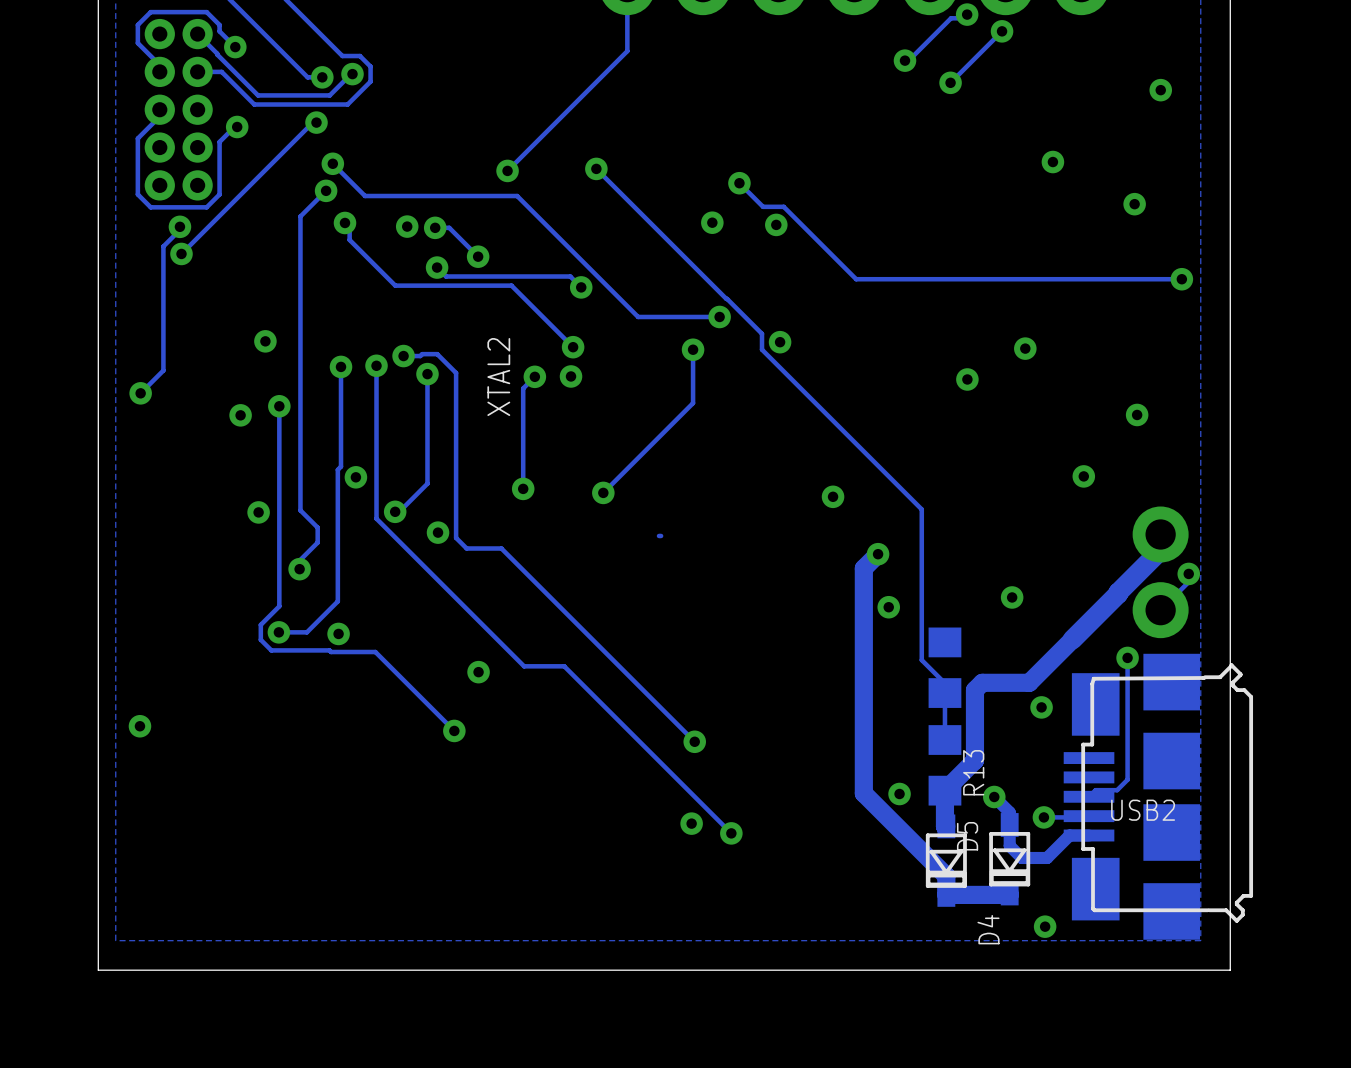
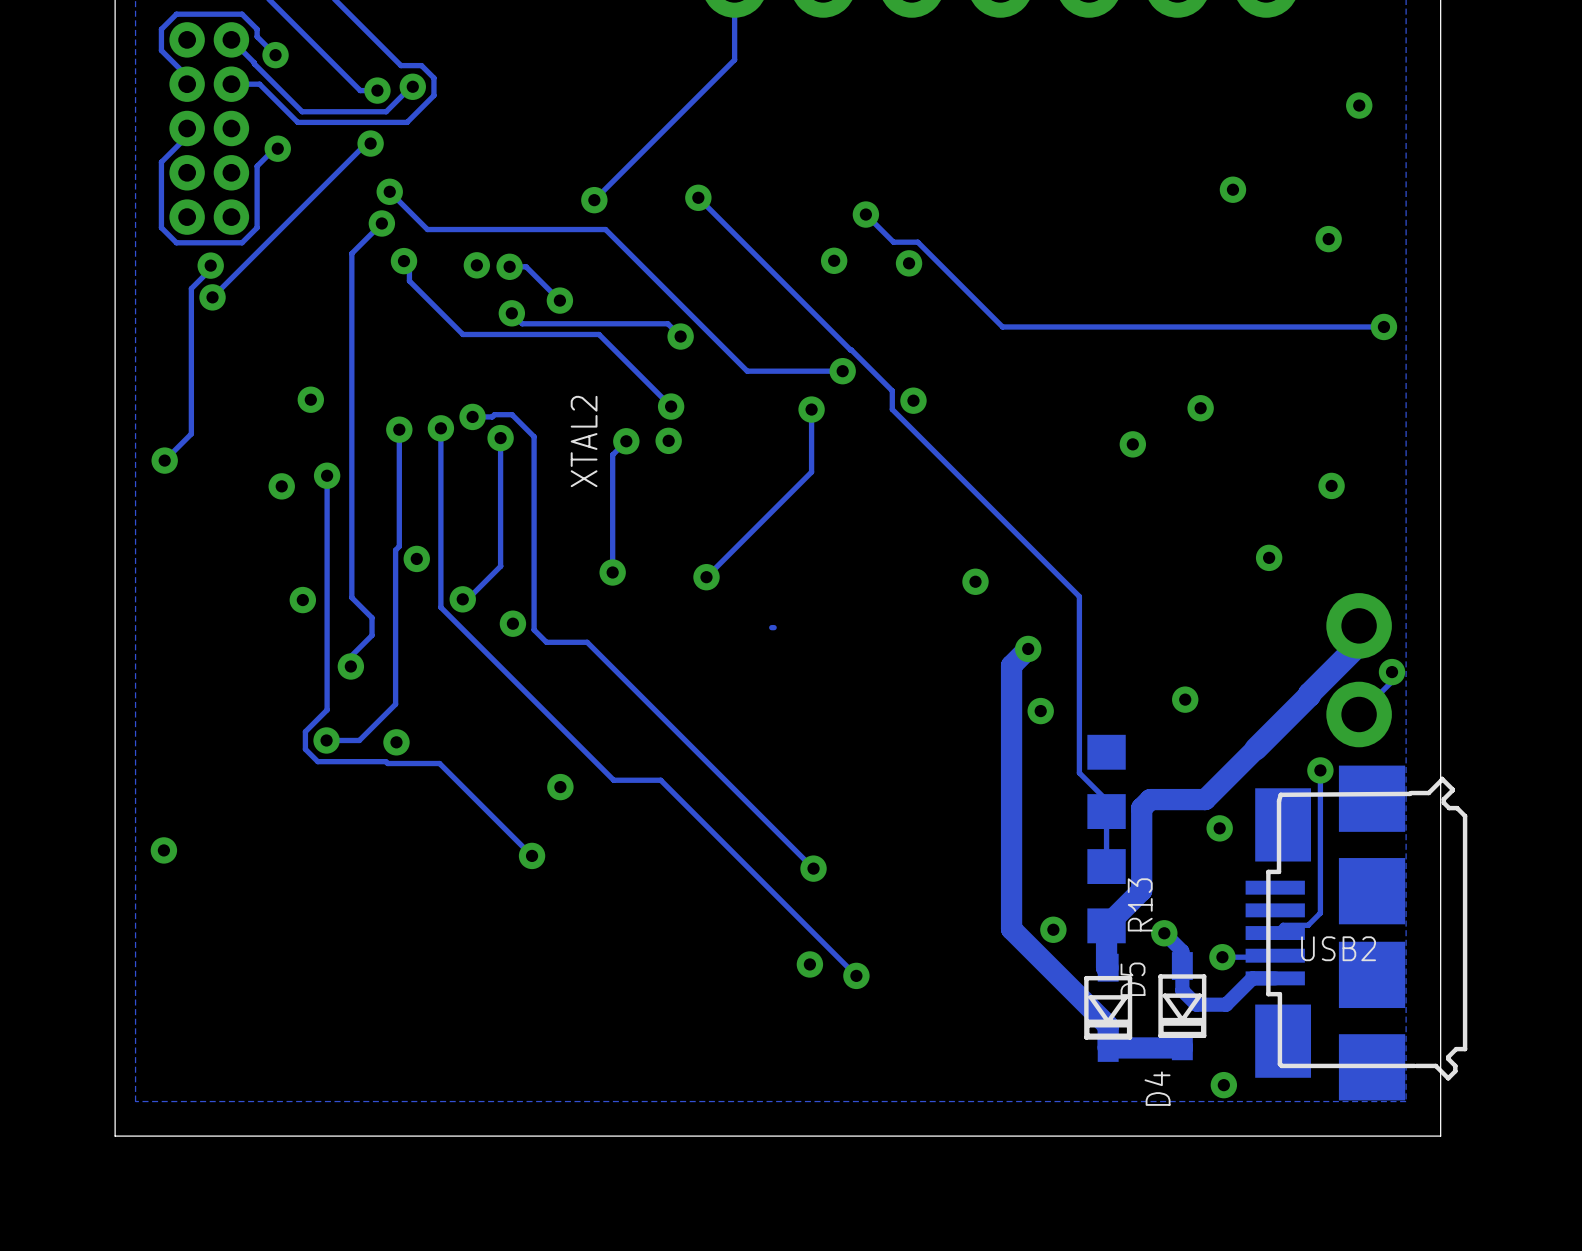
track: (967, 14) (963, 18) (951, 18) (908, 60) (904, 60) -> none
via: (967, 14) -> none
track: (1002, 31) (950, 82) -> none
via: (1002, 31) -> none
via: (904, 60) -> none
via: (950, 82) -> none

